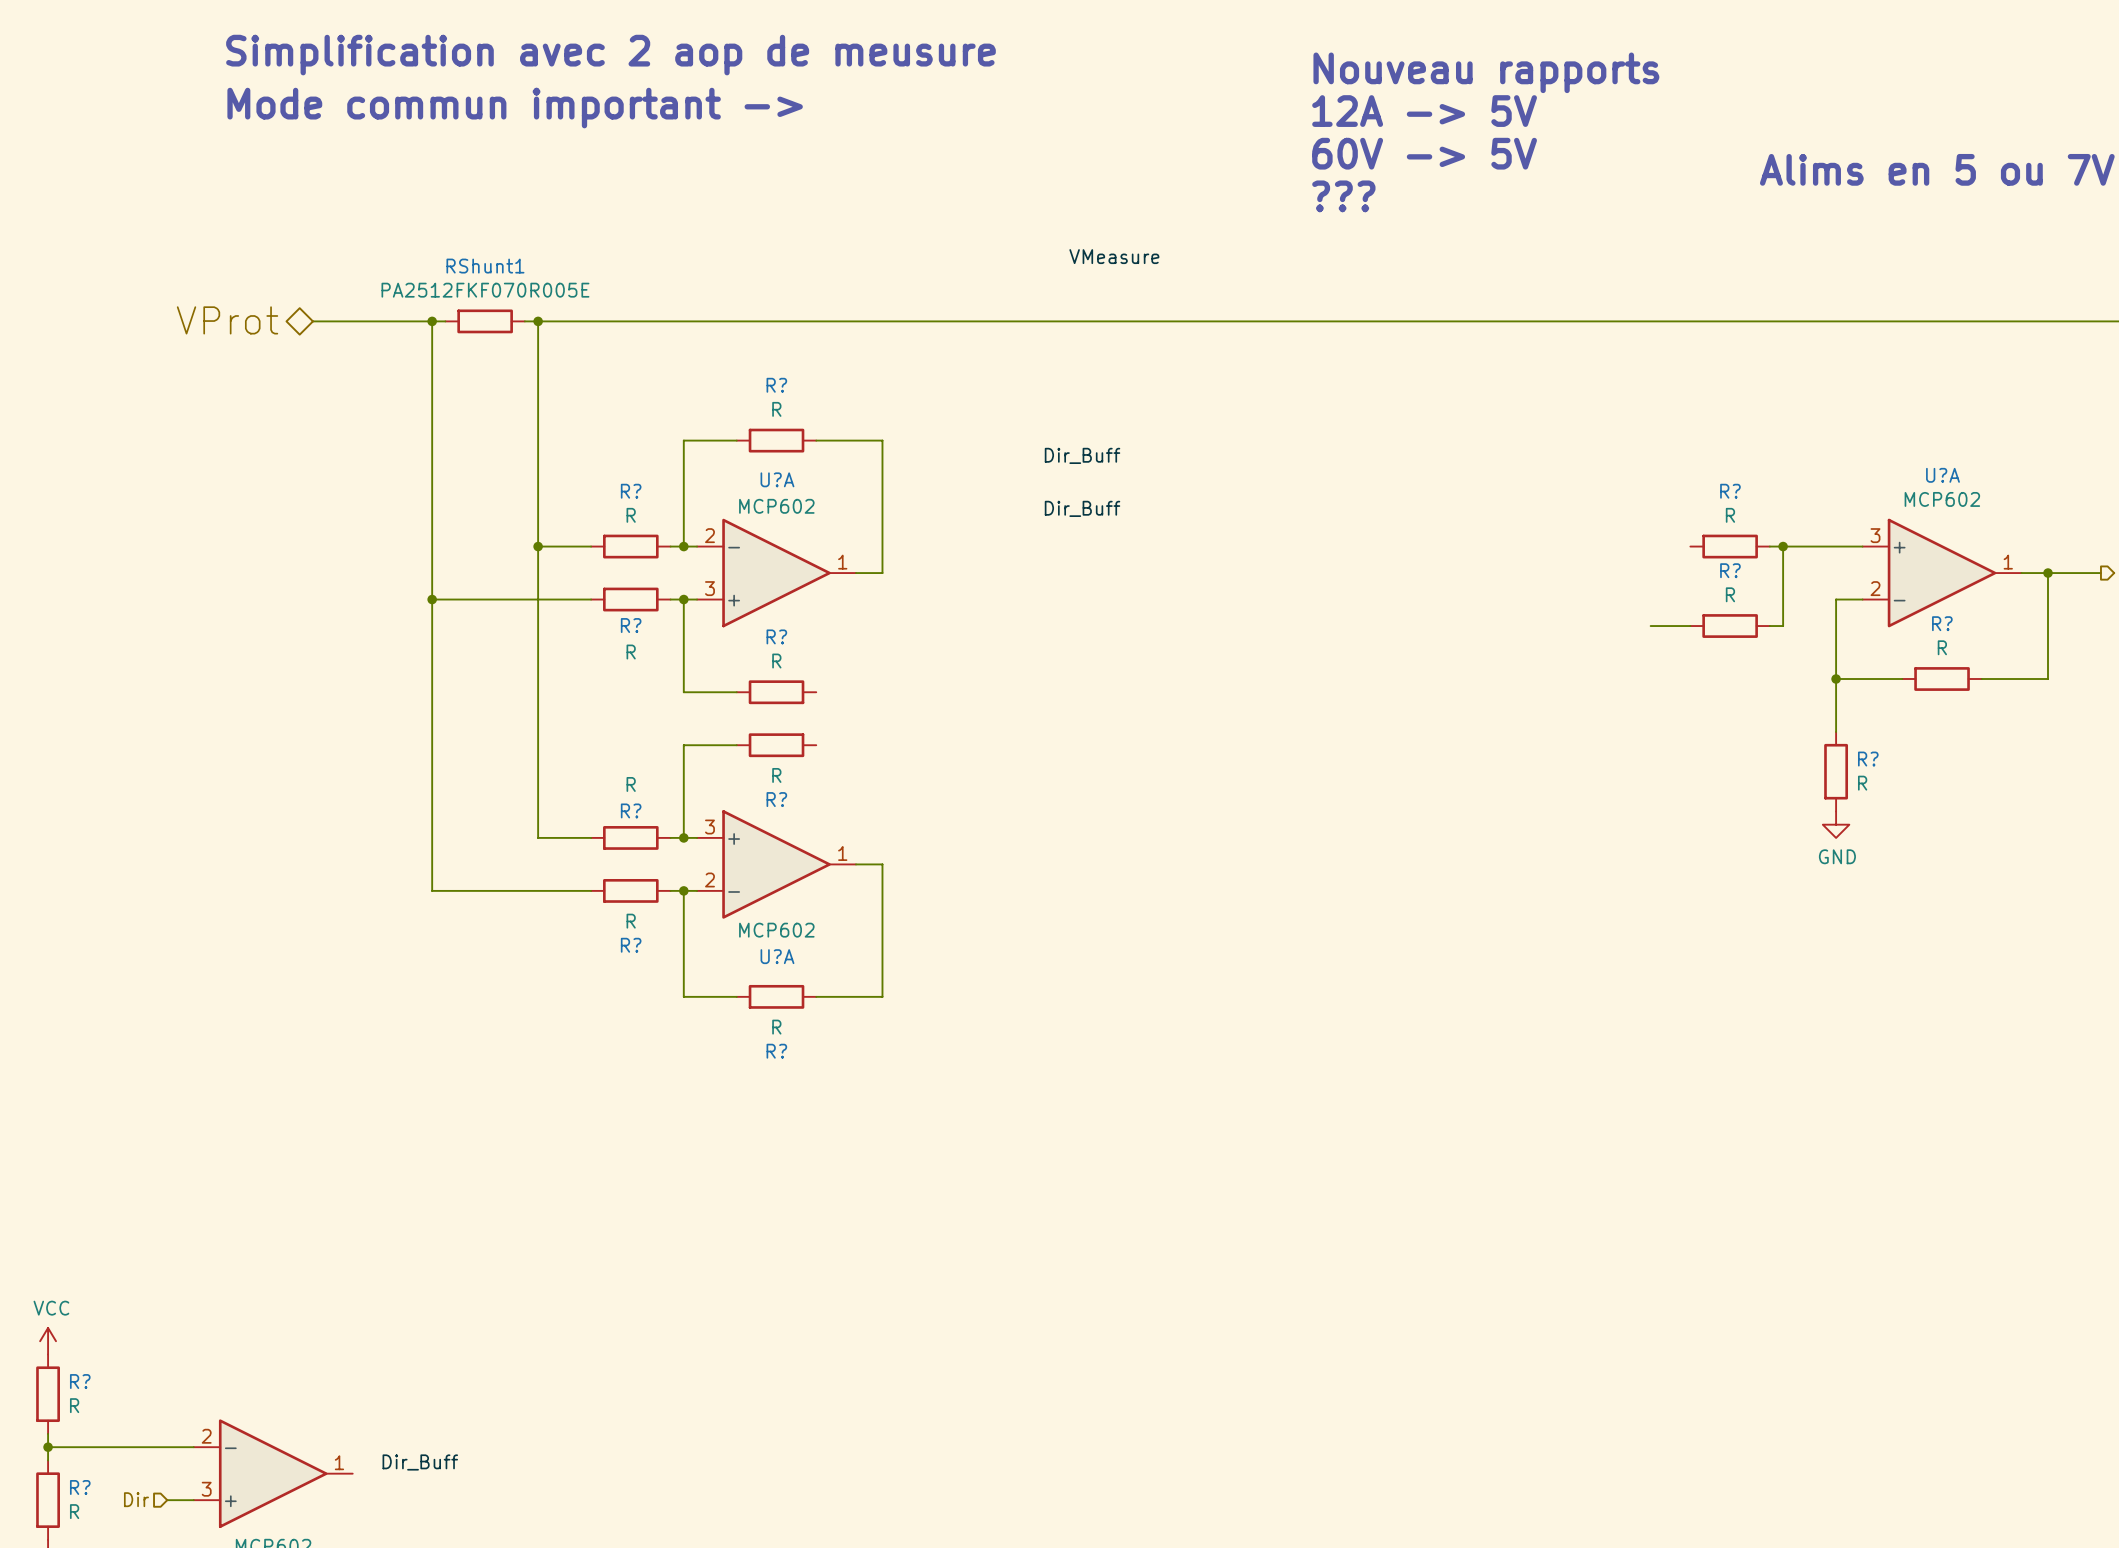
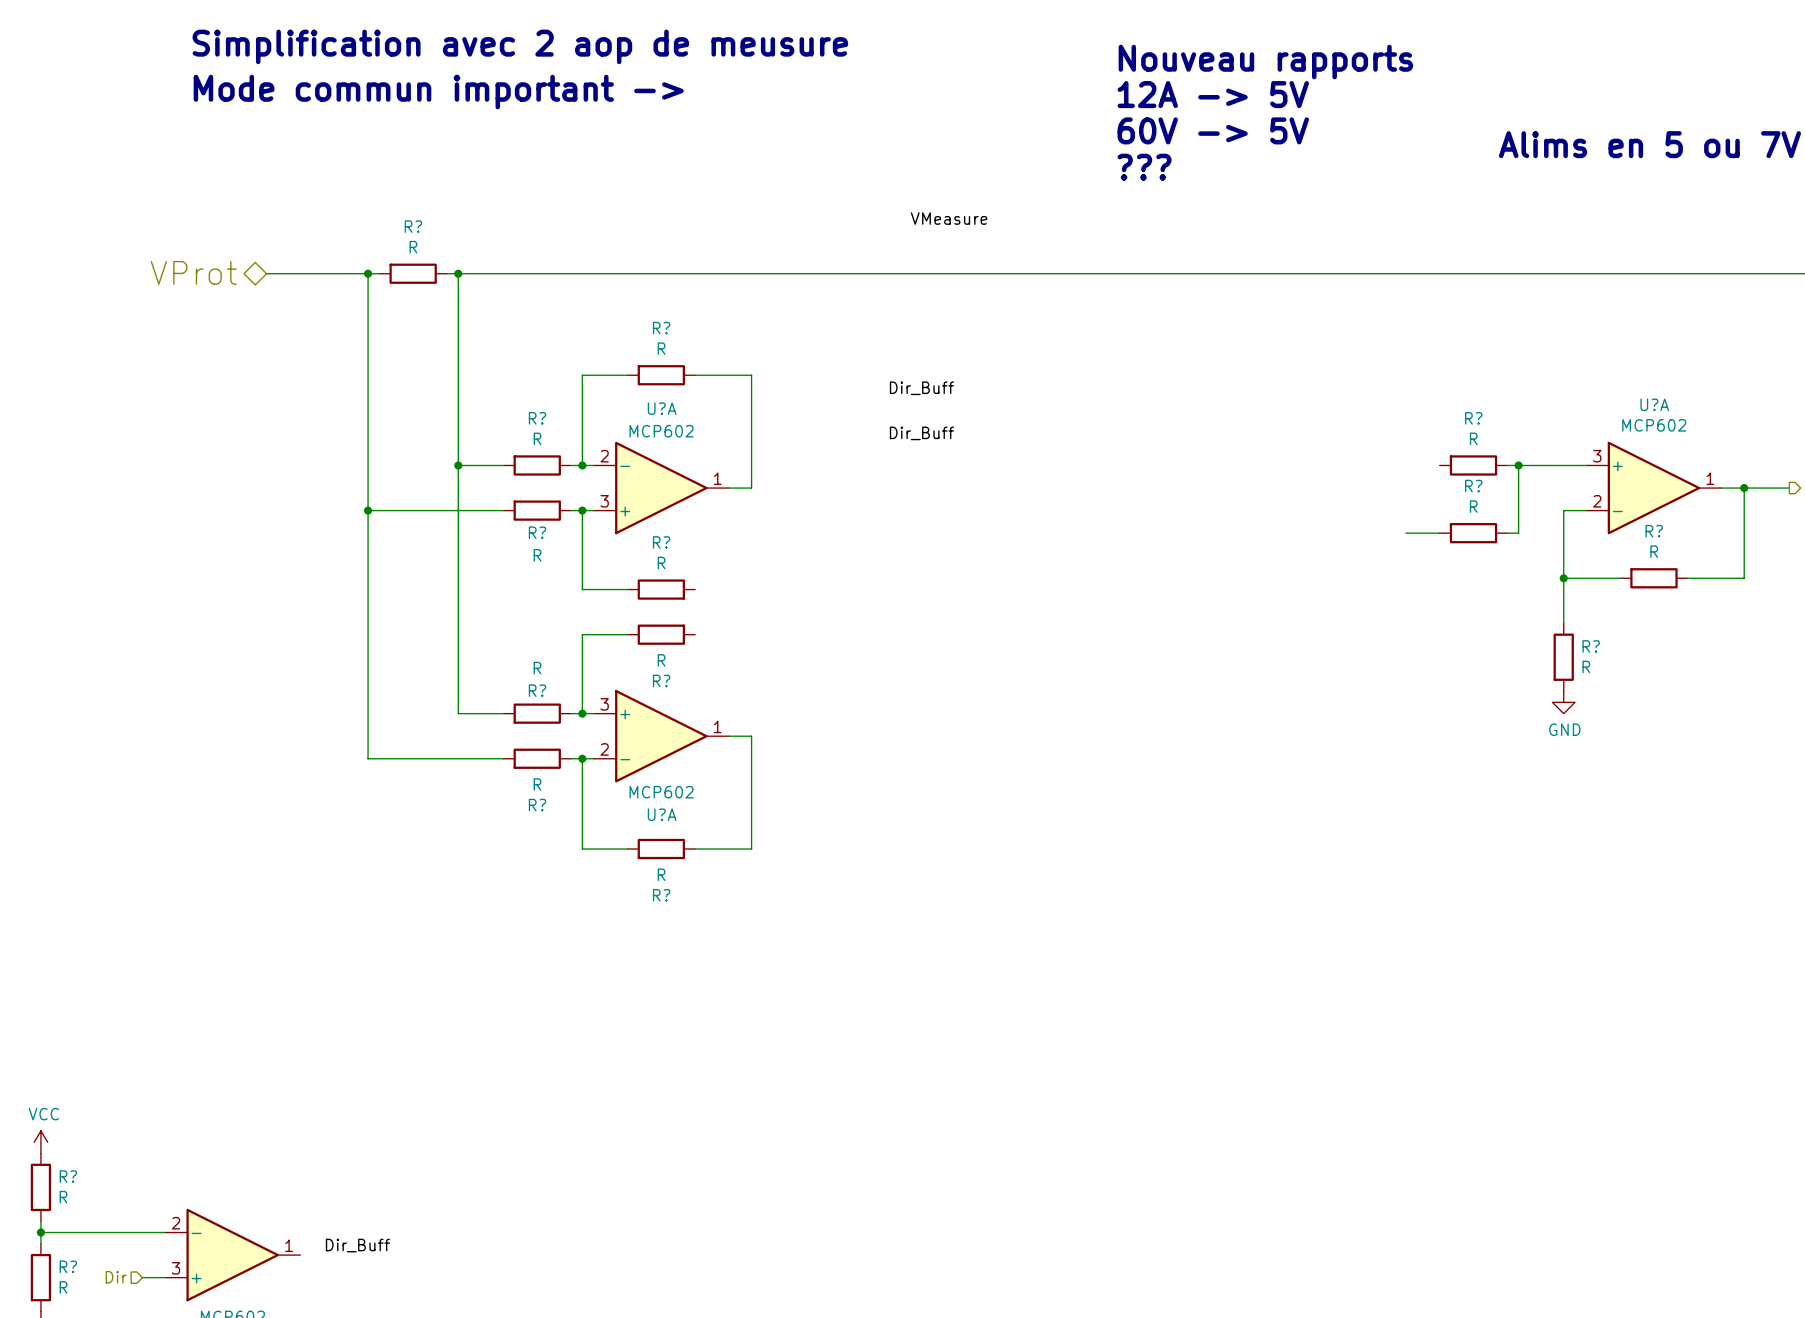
RShunt1 name: RShunt1 (485, 266) -> R? (413, 226)
RShunt1 value: PA2512FKF070R005E (485, 290) -> R (413, 247)

